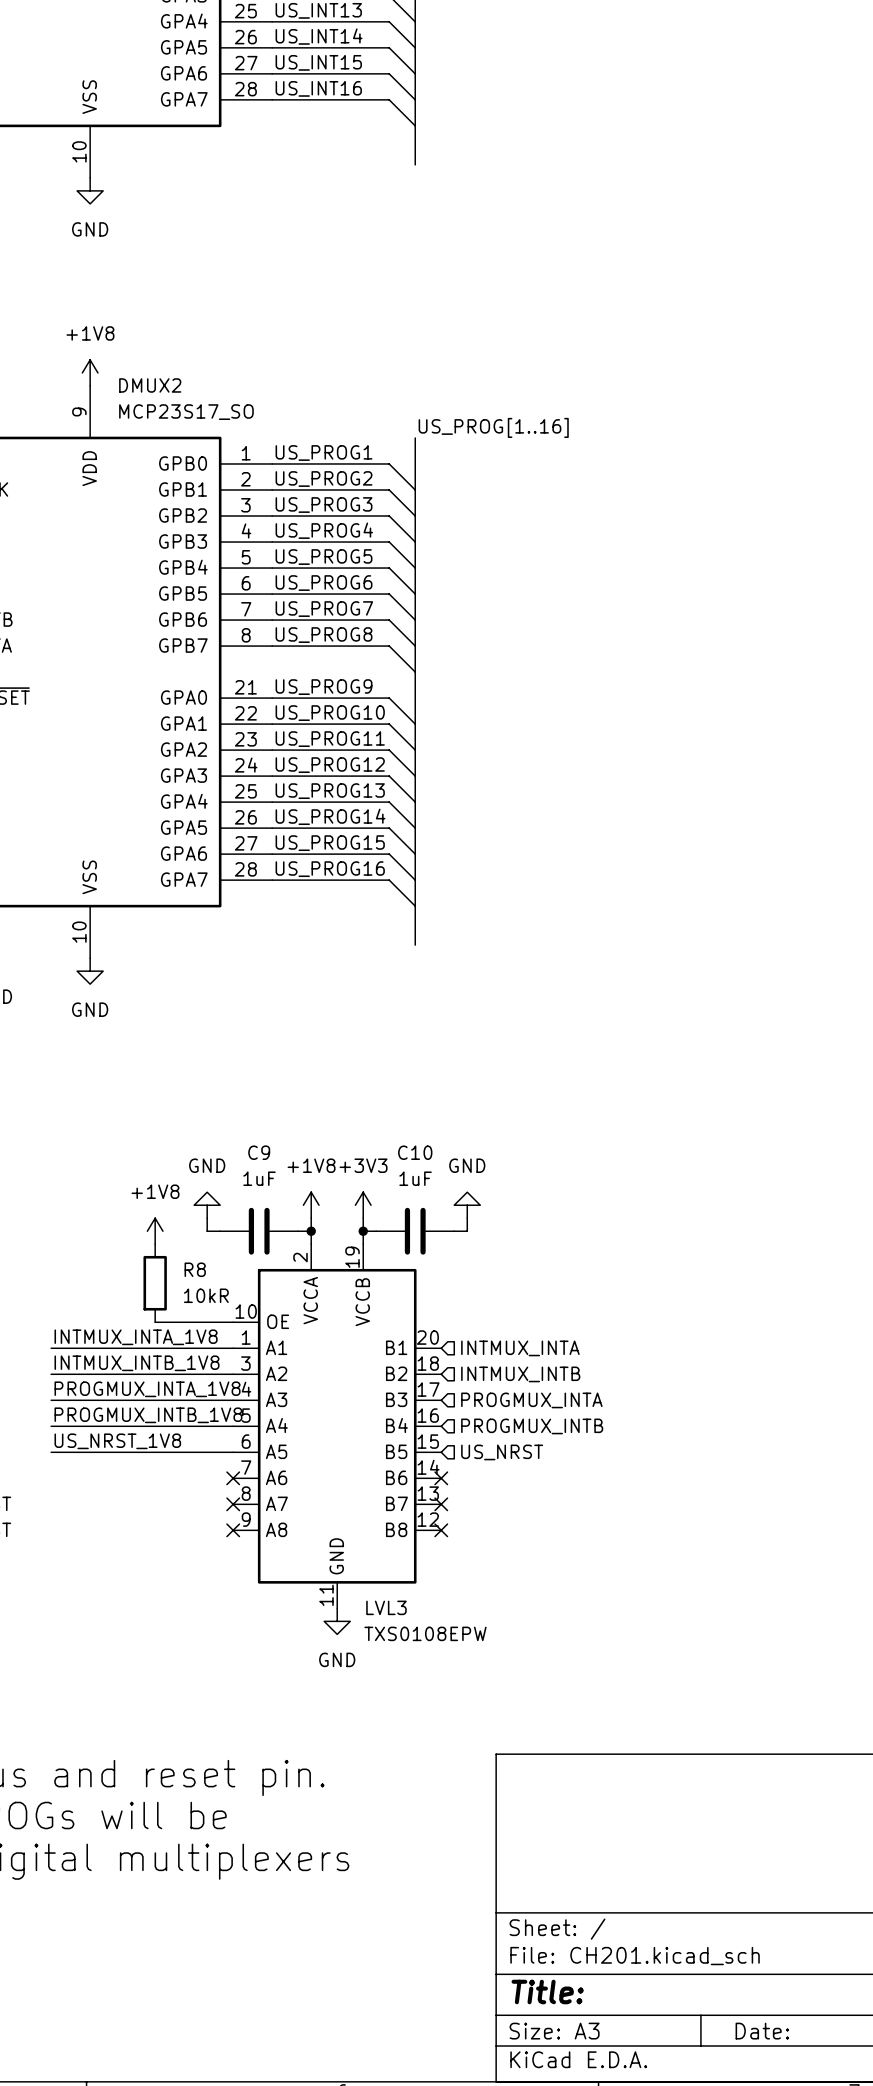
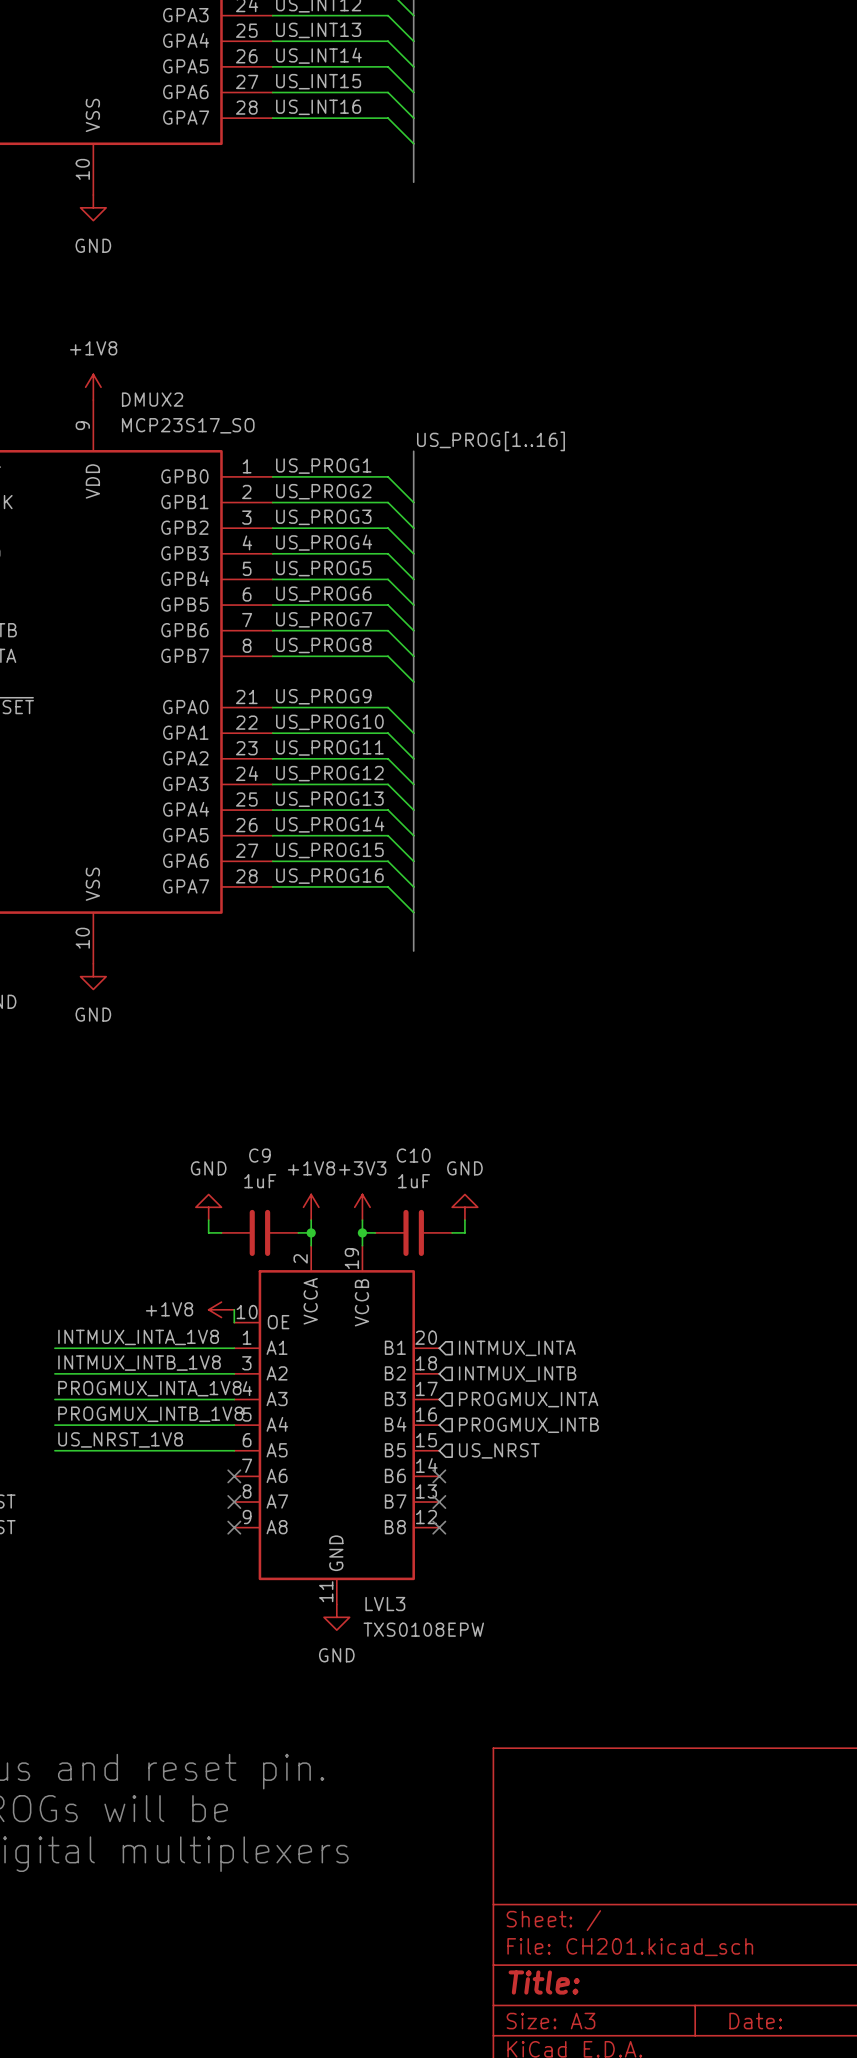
power symbol rotation: 0° (155, 1231) -> 90° counterclockwise (221, 1309)
power symbol position: +1V8 (155, 1231) -> +1V8 (221, 1309)
R8: 10kR (155, 1283) -> none
wire: (155, 1322) (233, 1322) -> (234, 1309) (234, 1322)

